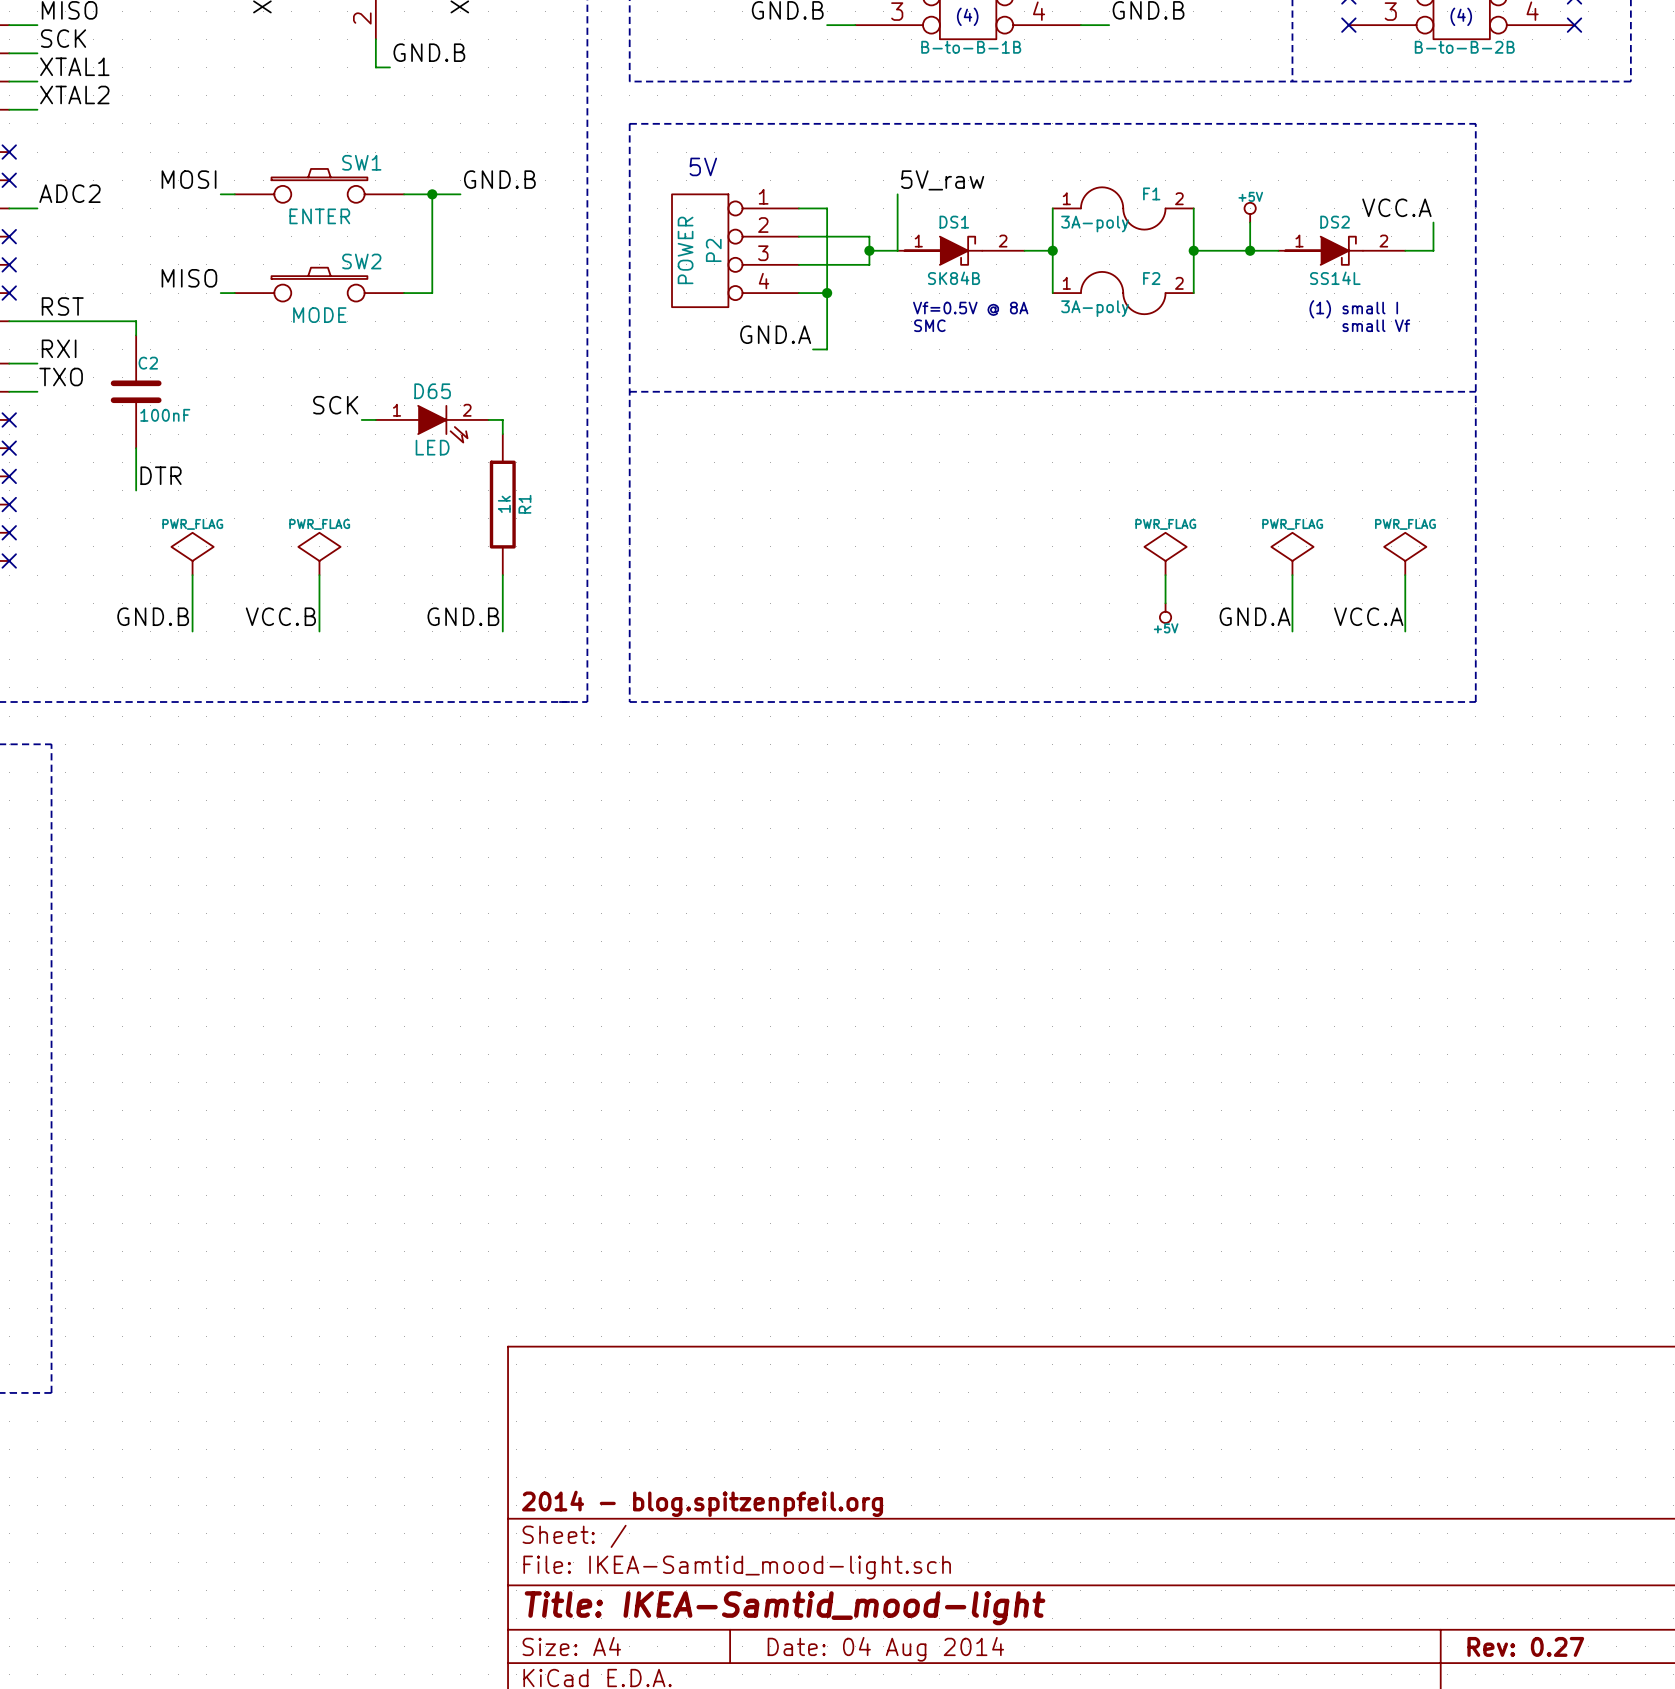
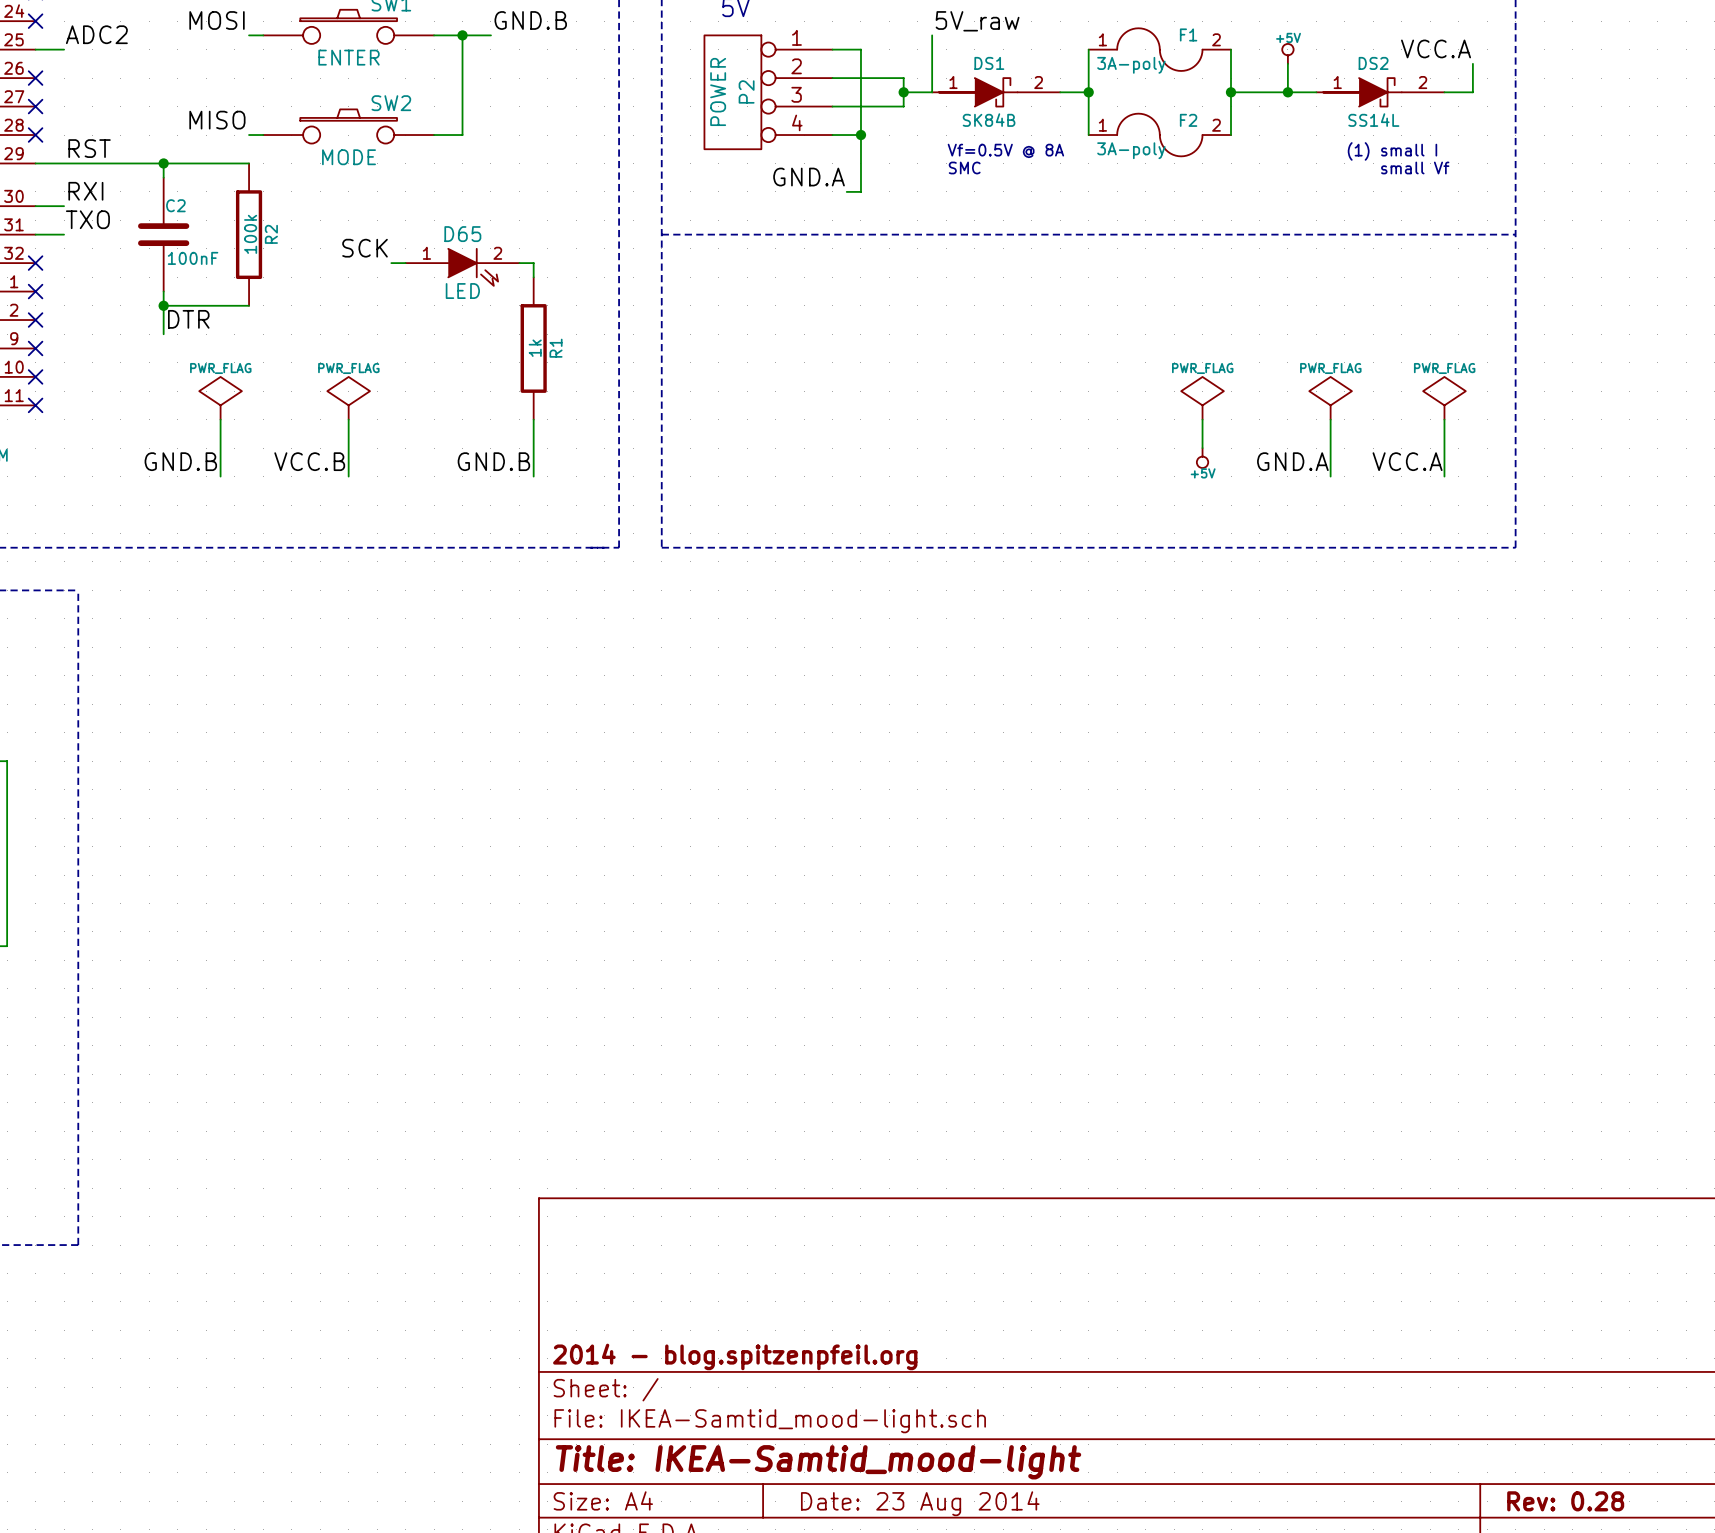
wire: none -> (163, 163) (249, 163)
junction: none -> (163, 163)
R2: none -> 100k (249, 234)
wire: none -> (163, 305) (249, 305)
junction: none -> (163, 305)
title block: Rev: 0.27 (1525, 1646) -> Rev: 0.28 (1565, 1501)
title block: Date: 04 Aug 2014 (885, 1649) -> Date: 23 Aug 2014 (920, 1503)

